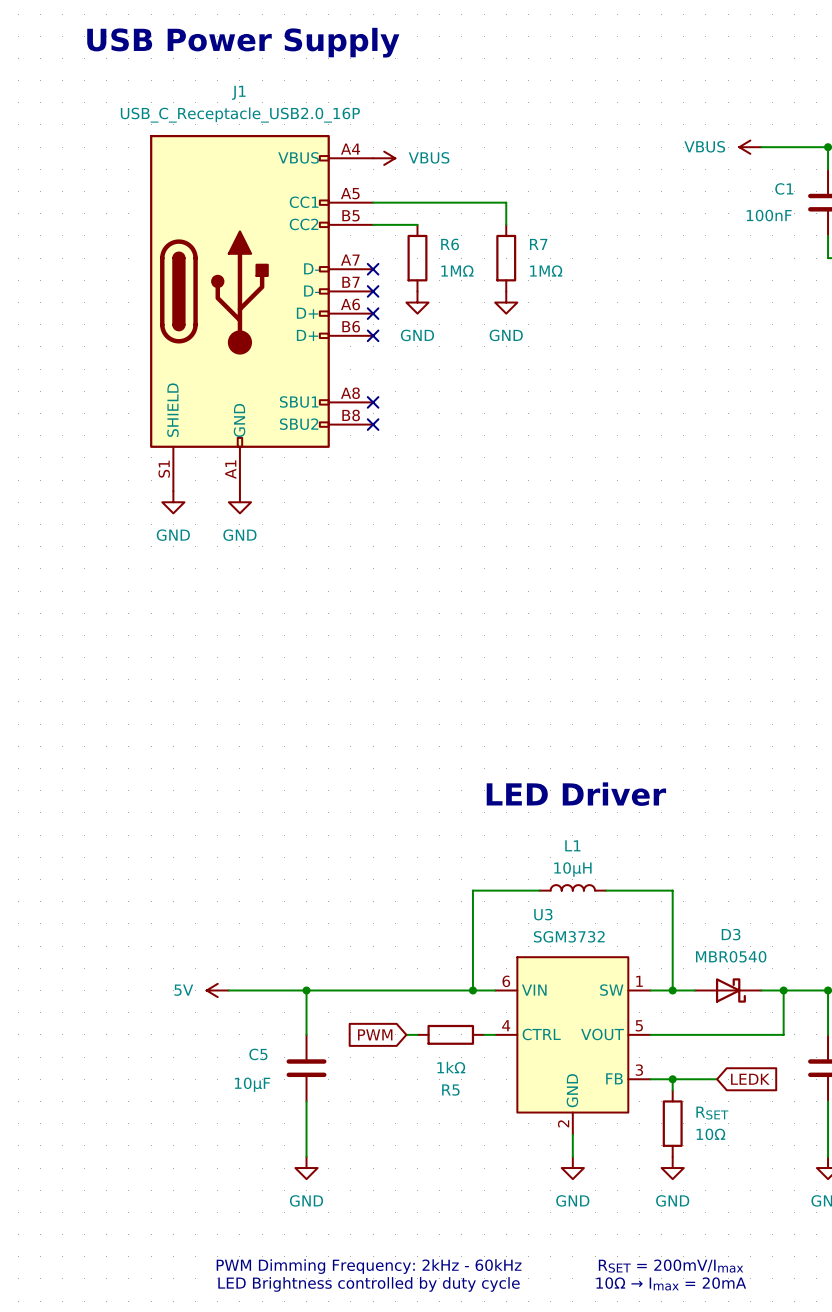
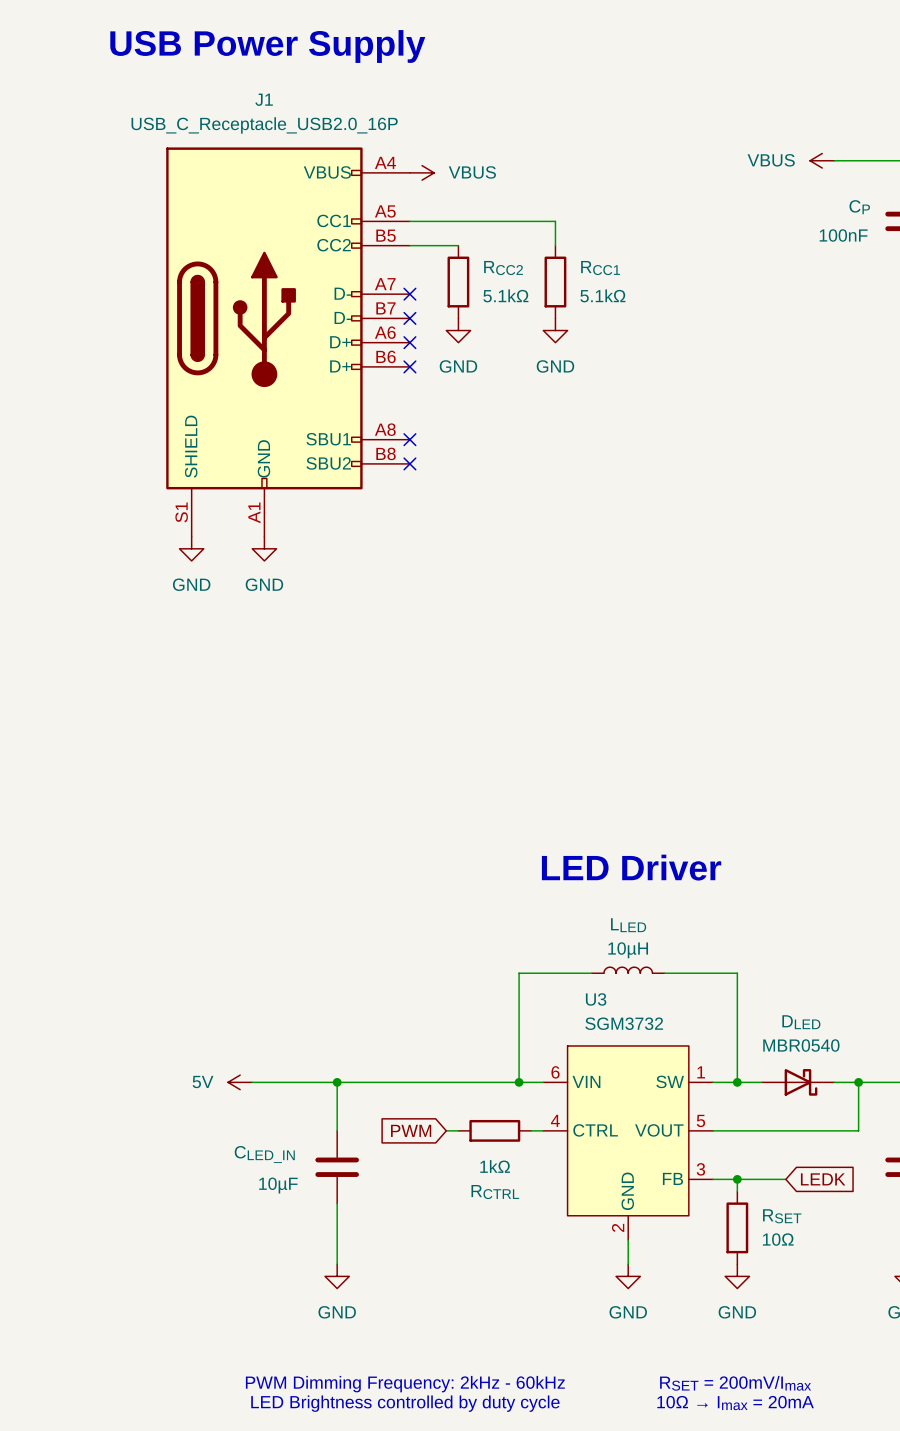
C1 name: C1 (784, 188) -> CP (859, 207)
R6 name: R6 (450, 244) -> RCC2 (503, 268)
R7 name: R7 (538, 244) -> RCC1 (600, 268)
R6 value: 1MΩ (457, 270) -> 5.1kΩ (505, 295)
R7 value: 1MΩ (546, 270) -> 5.1kΩ (602, 295)
L1 name: L1 (572, 845) -> LLED (628, 925)
D3 name: D3 (731, 934) -> DLED (801, 1022)
C5 name: C5 (258, 1054) -> CLED_IN (264, 1154)
R5 name: R5 (450, 1090) -> RCTRL (495, 1192)

